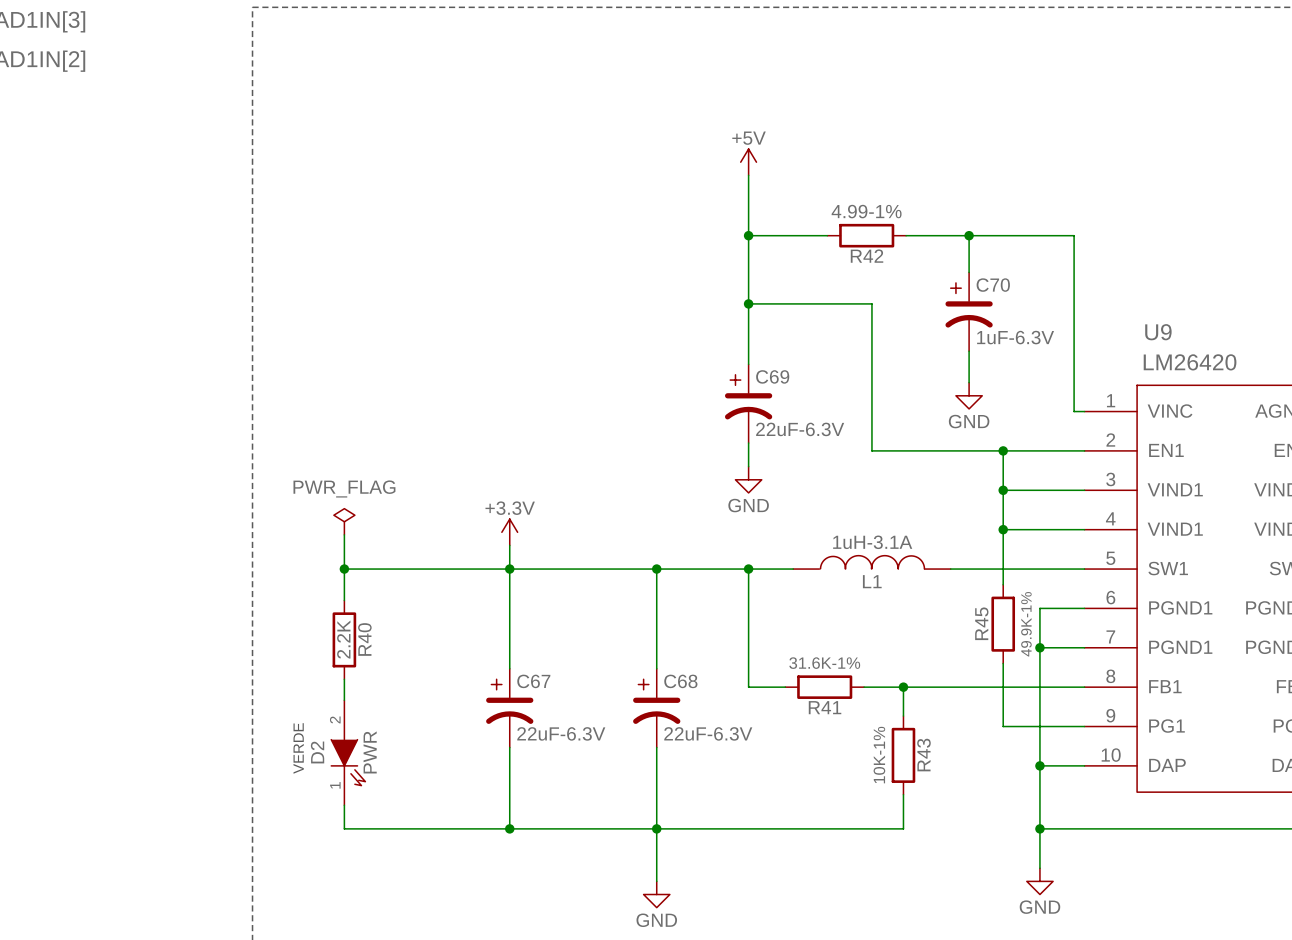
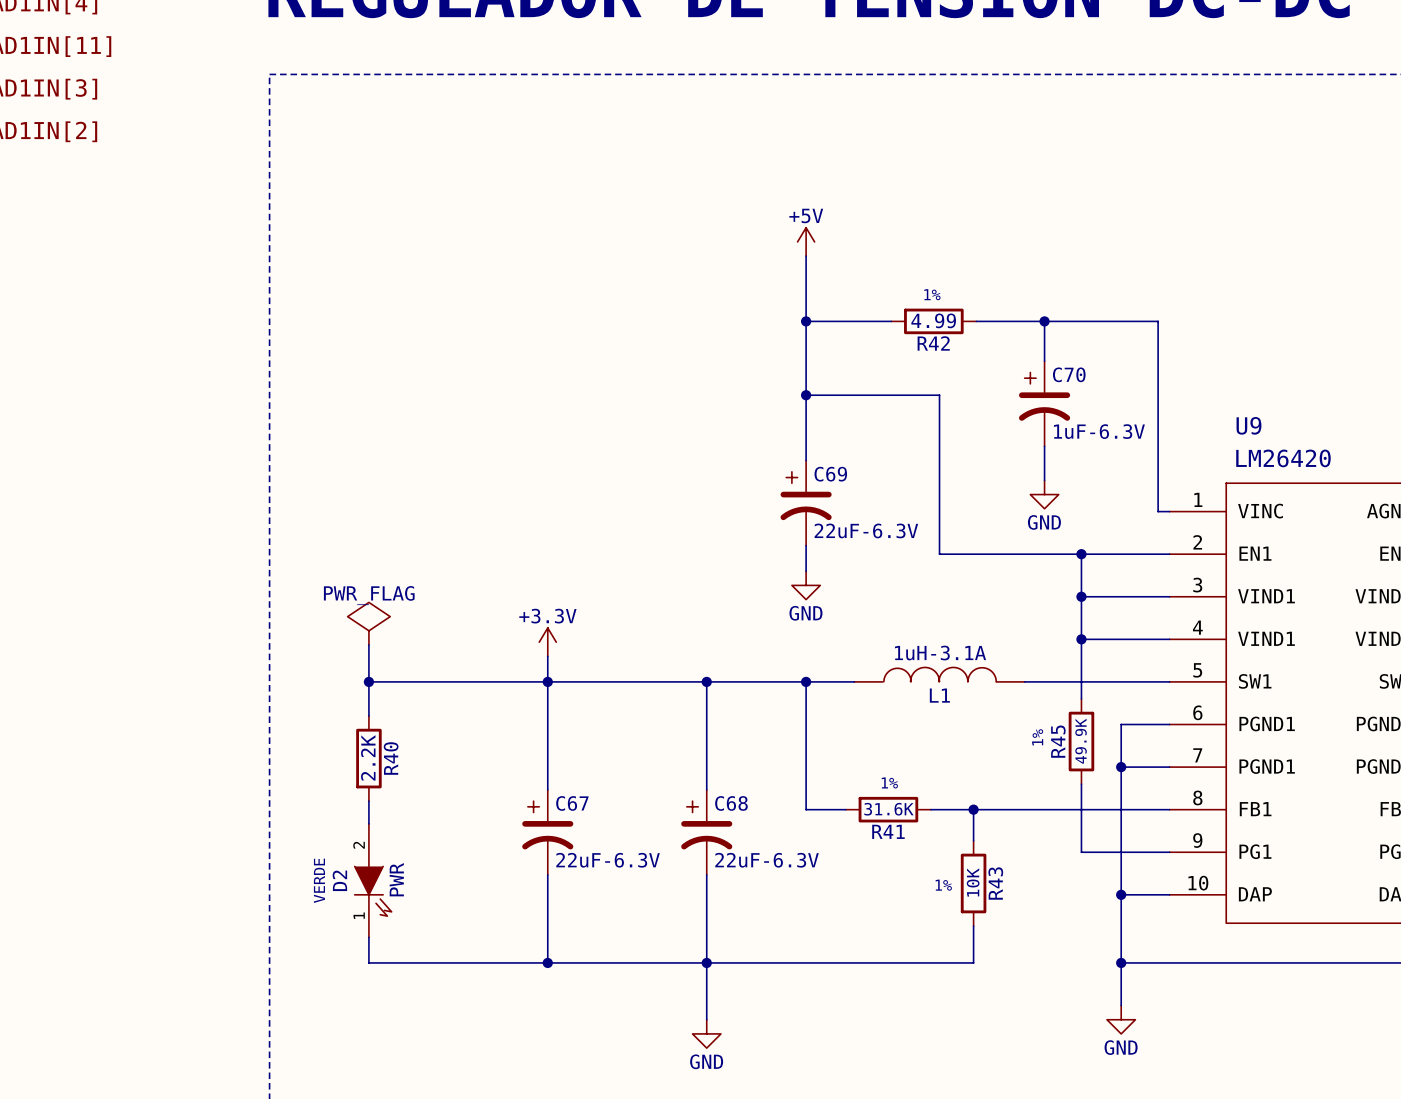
text: none -> 1% (932, 294)
R42 value: 4.99-1% (866, 211) -> 4.99 (933, 320)
power symbol shape: [333, 508, 355, 535] -> [347, 602, 391, 646]
text: none -> 1% (1037, 737)
R45 value: 49.9K-1% (1026, 624) -> 49.9K (1081, 741)
text: none -> 1% (889, 782)
R41 value: 31.6K-1% (824, 663) -> 31.6K (888, 809)
R43 value: 10K-1% (879, 755) -> 10K (973, 882)
text: none -> 1% (943, 885)

